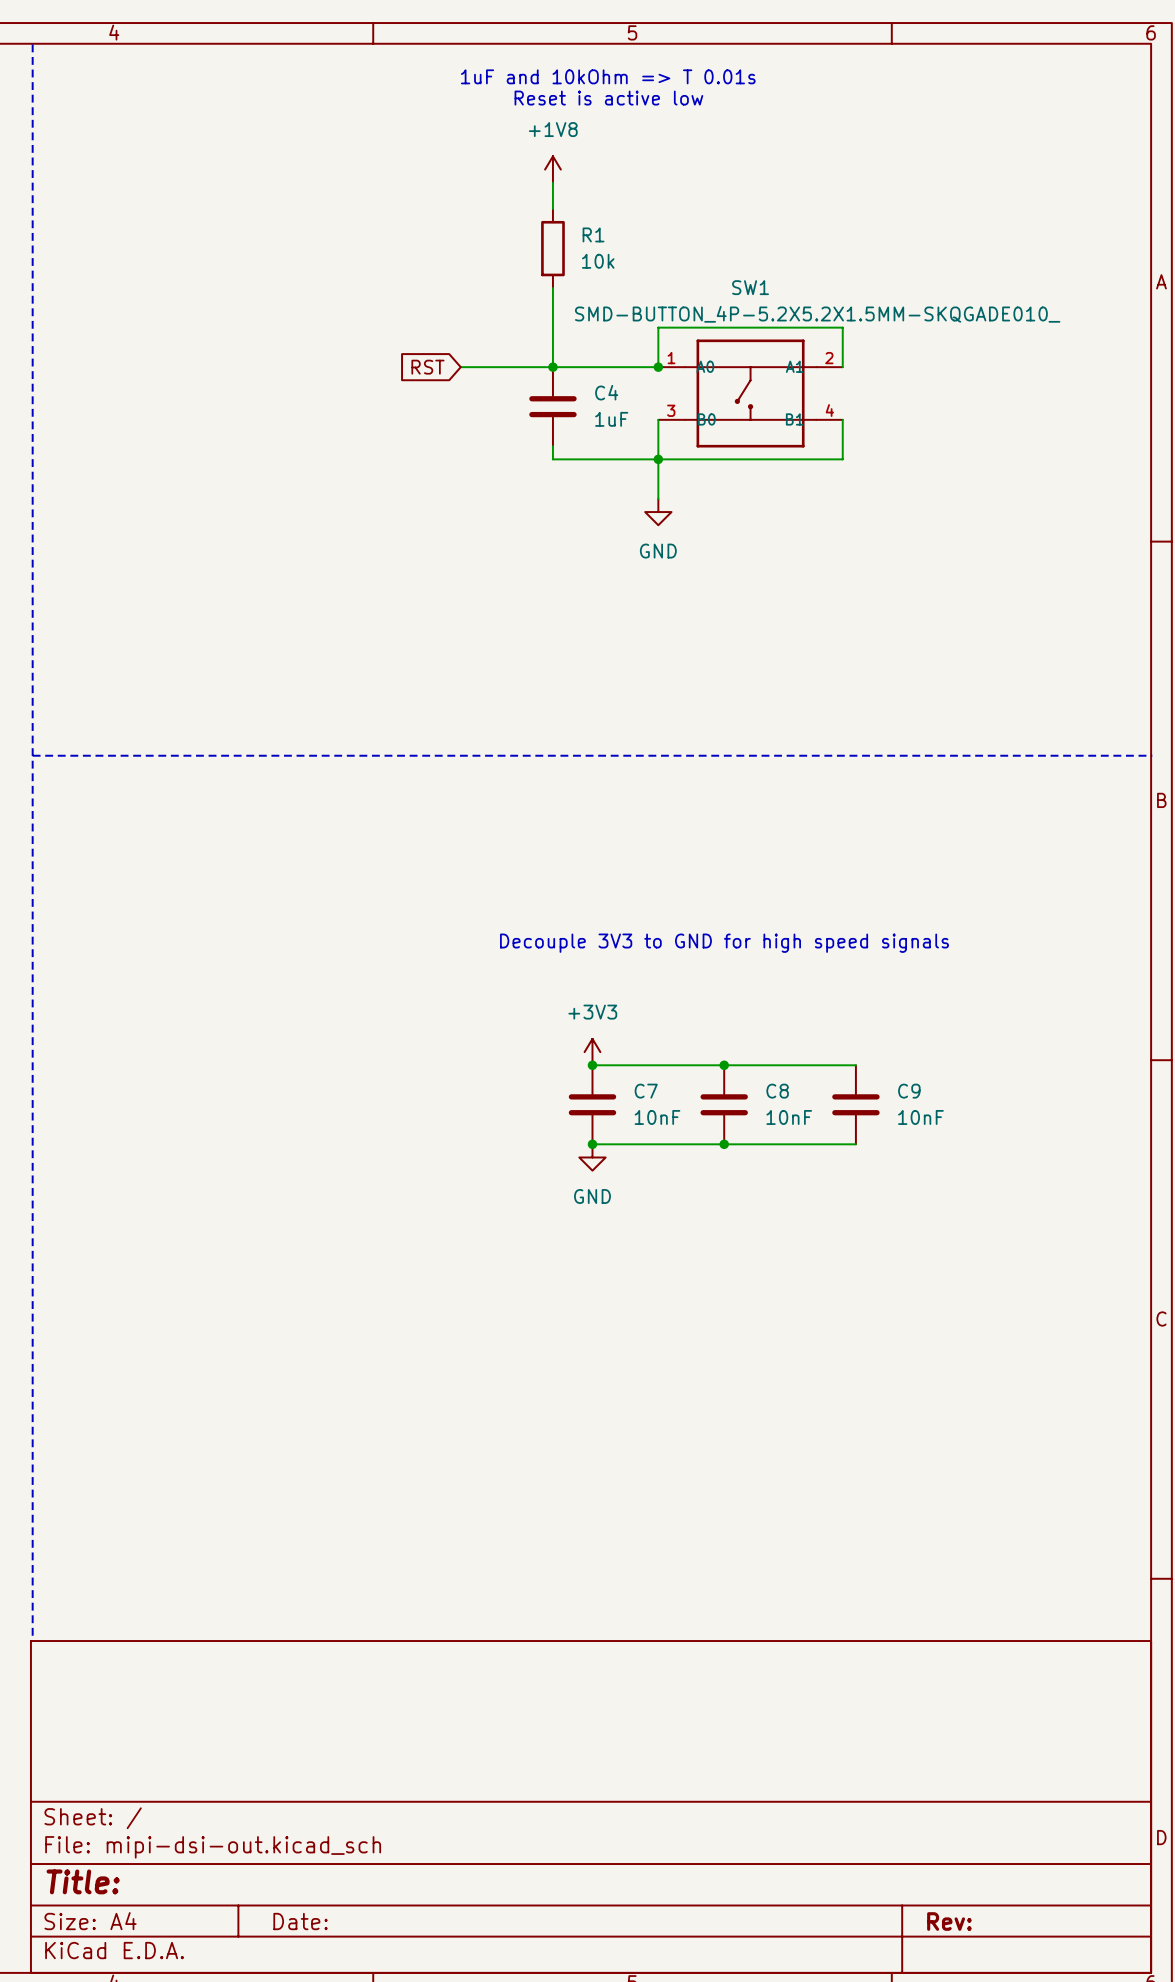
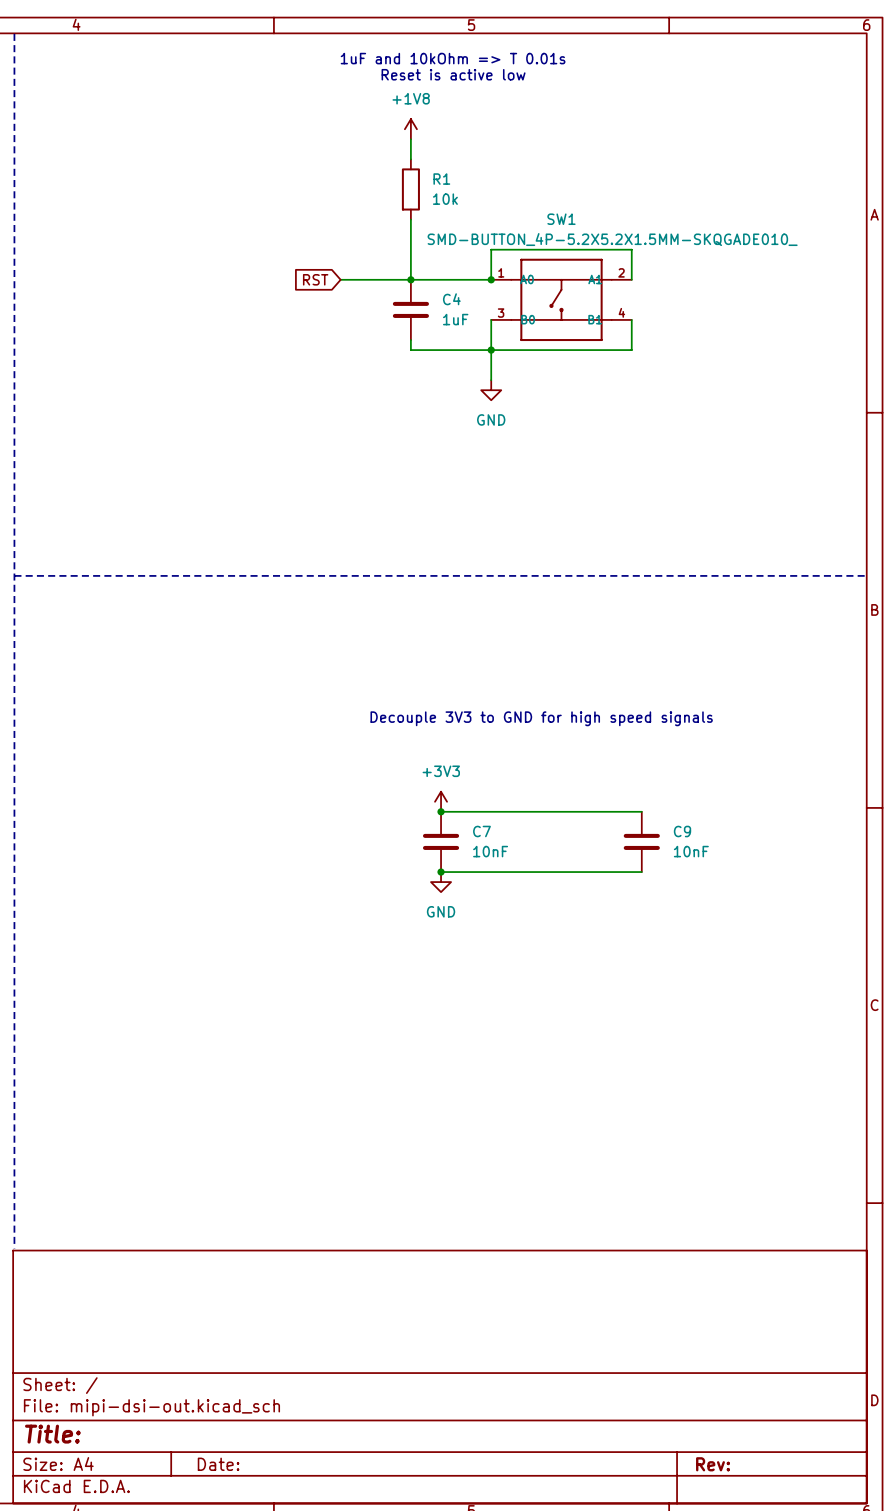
junction: (724, 1065) -> none
C8: 10nF (724, 1104) -> none
junction: (724, 1144) -> none

